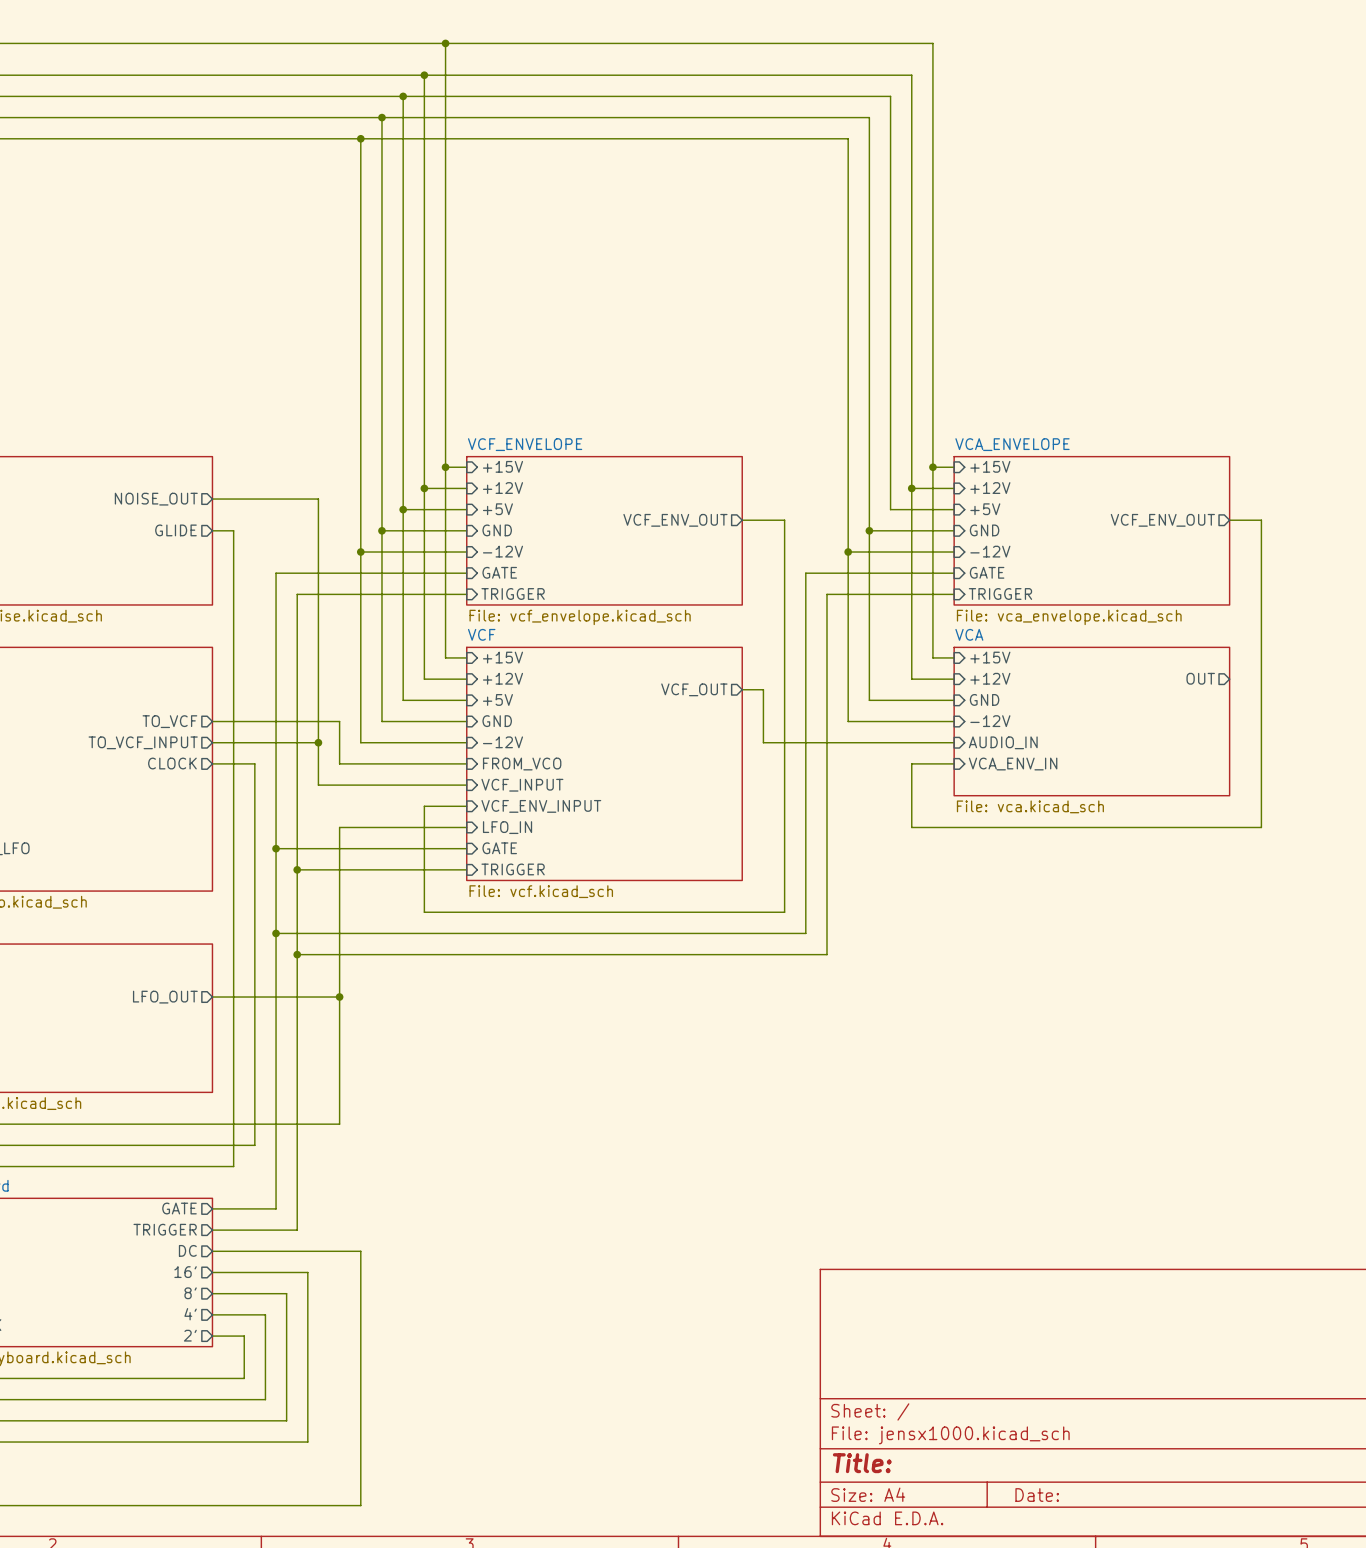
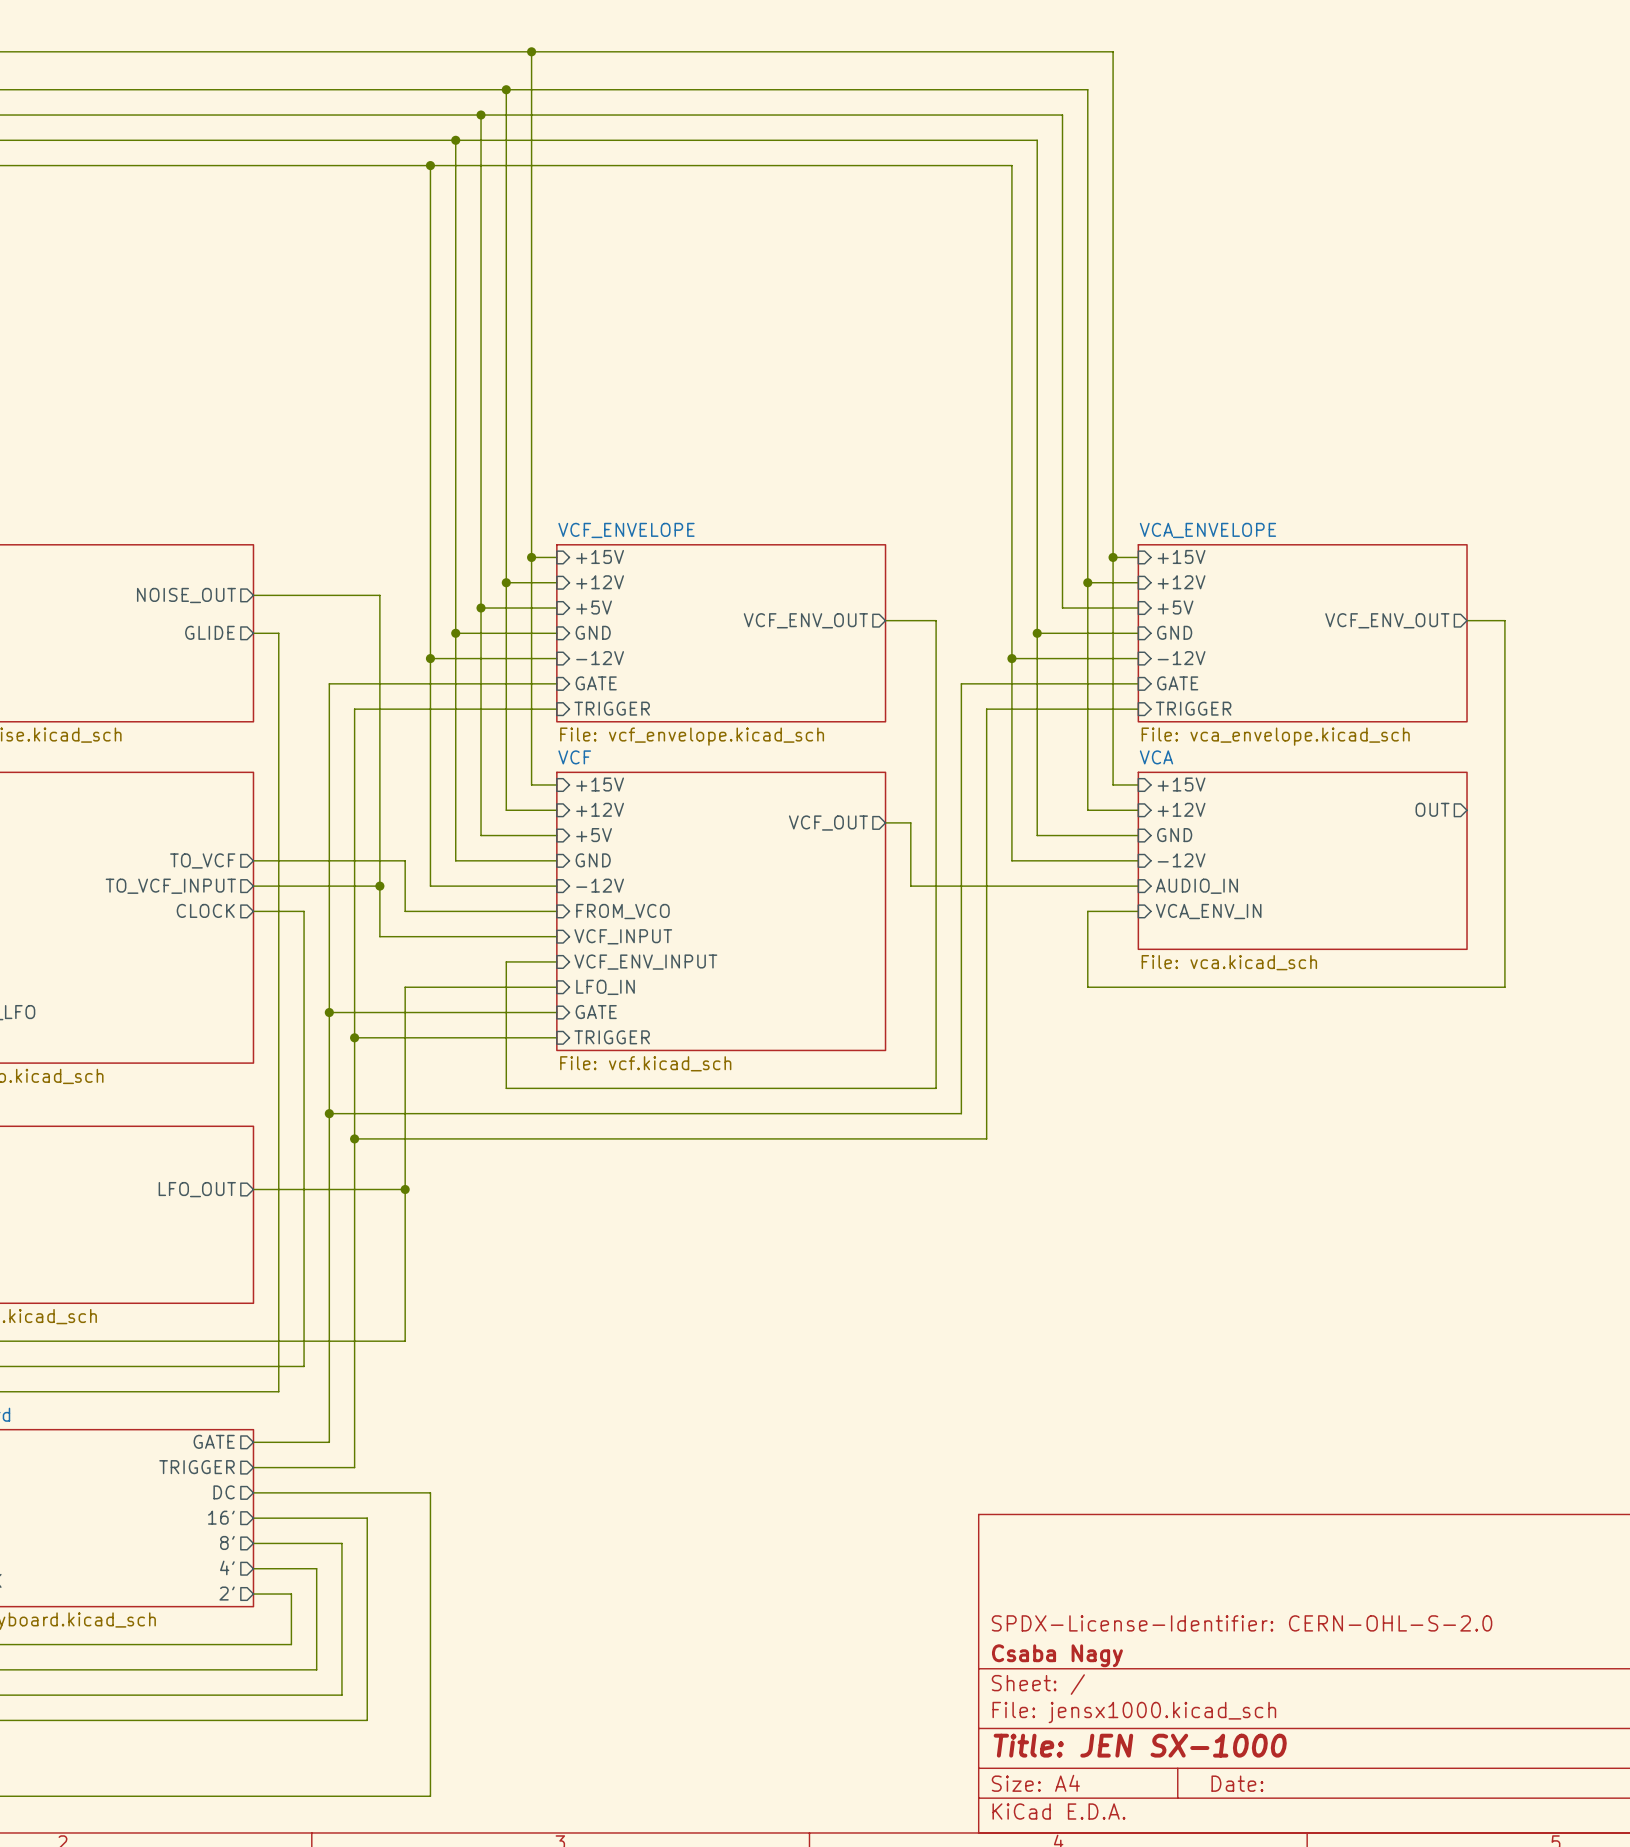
title block: none -> SPDX-License-Identifier: CERN-OHL-S-2.0 (1242, 1623)
title block: none -> Csaba Nagy (1057, 1655)
title block: Title: (862, 1463) -> Title: JEN SX-1000 (1140, 1745)

